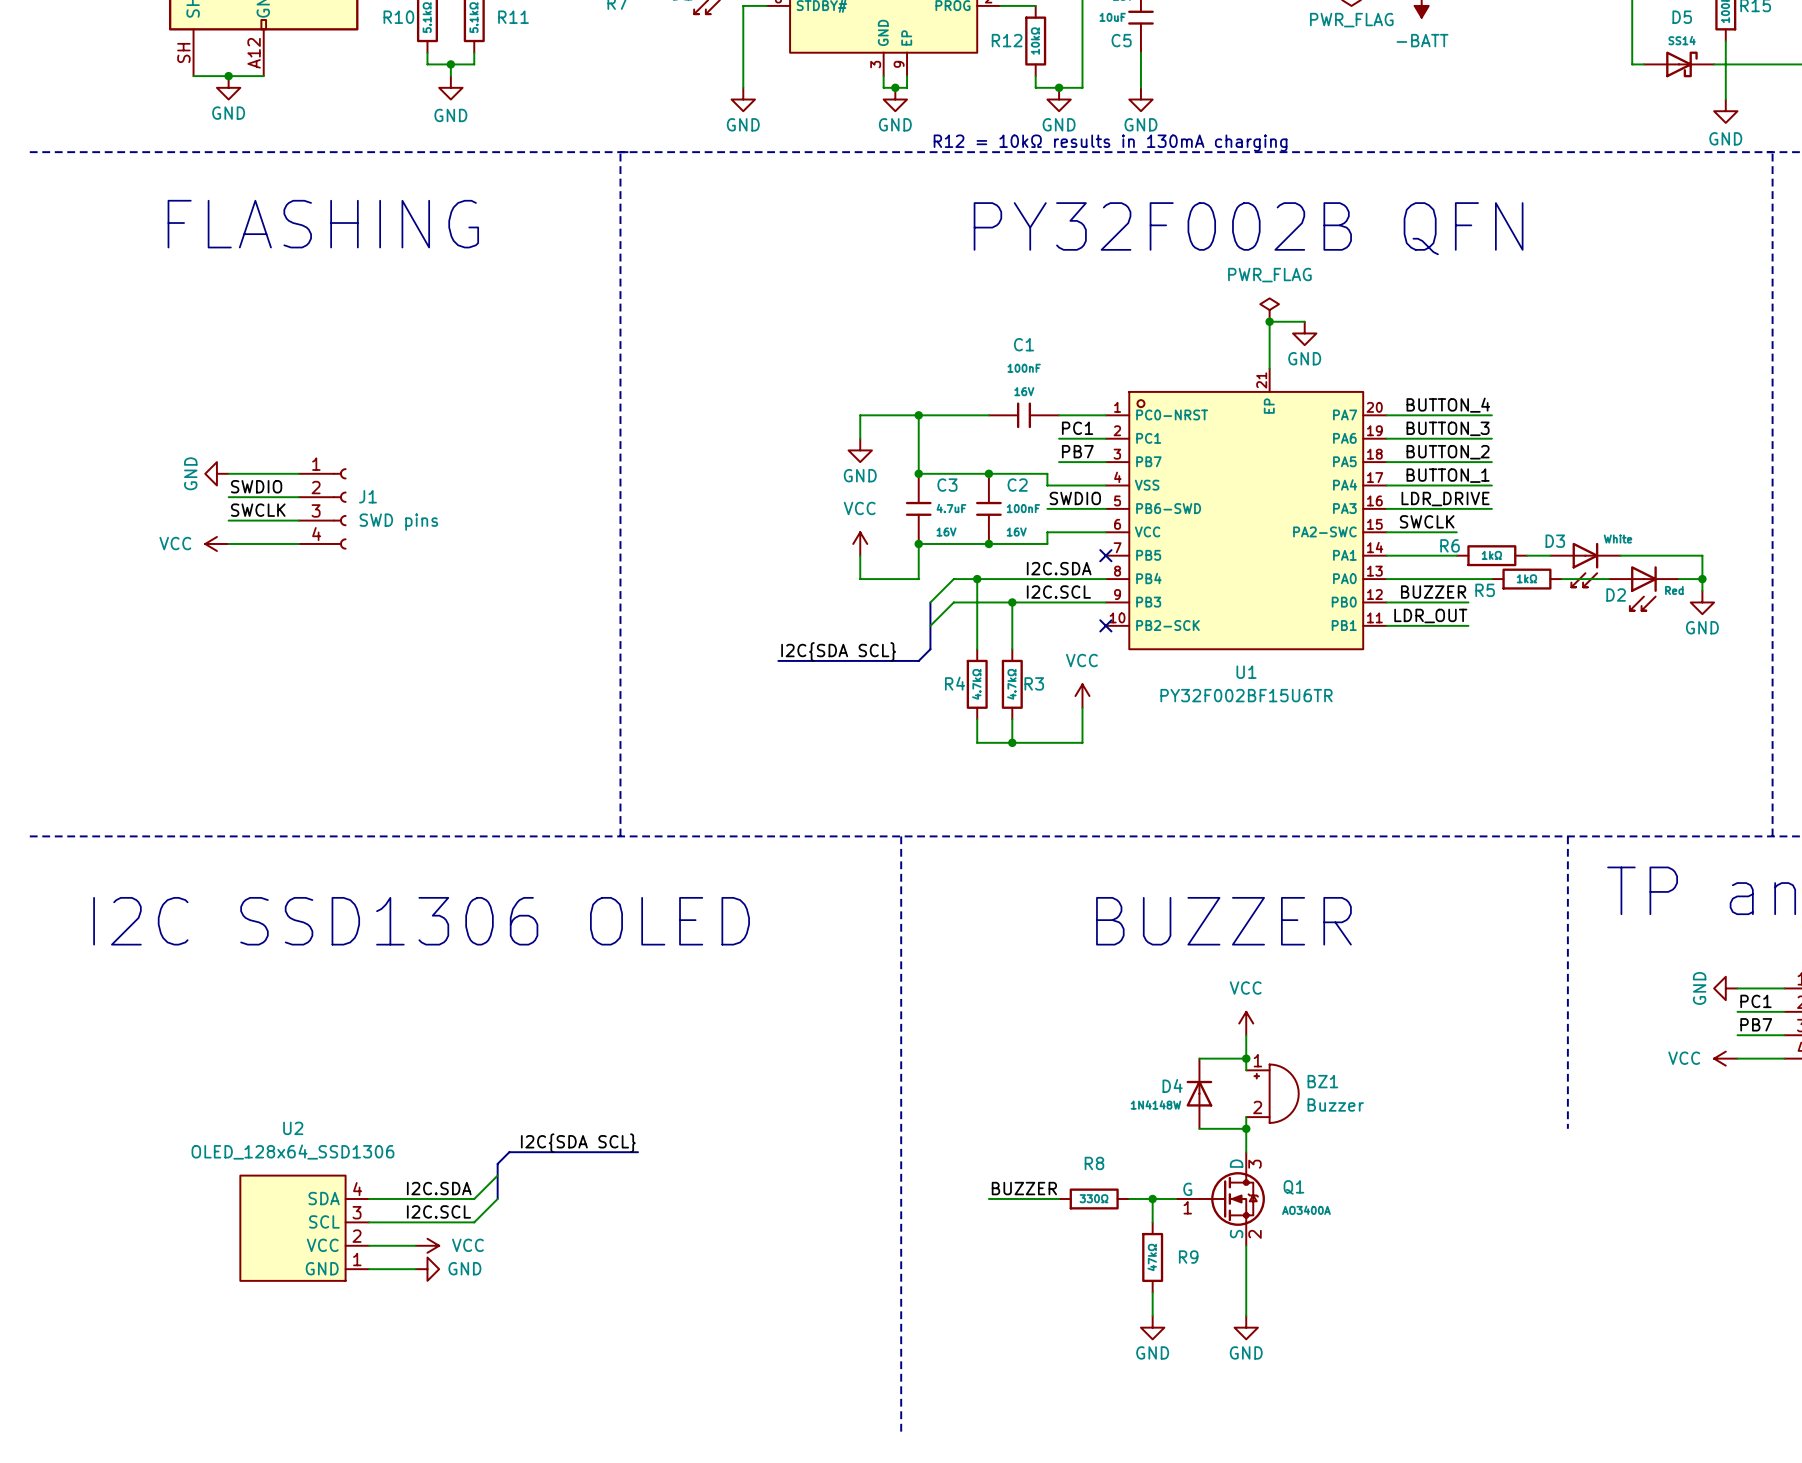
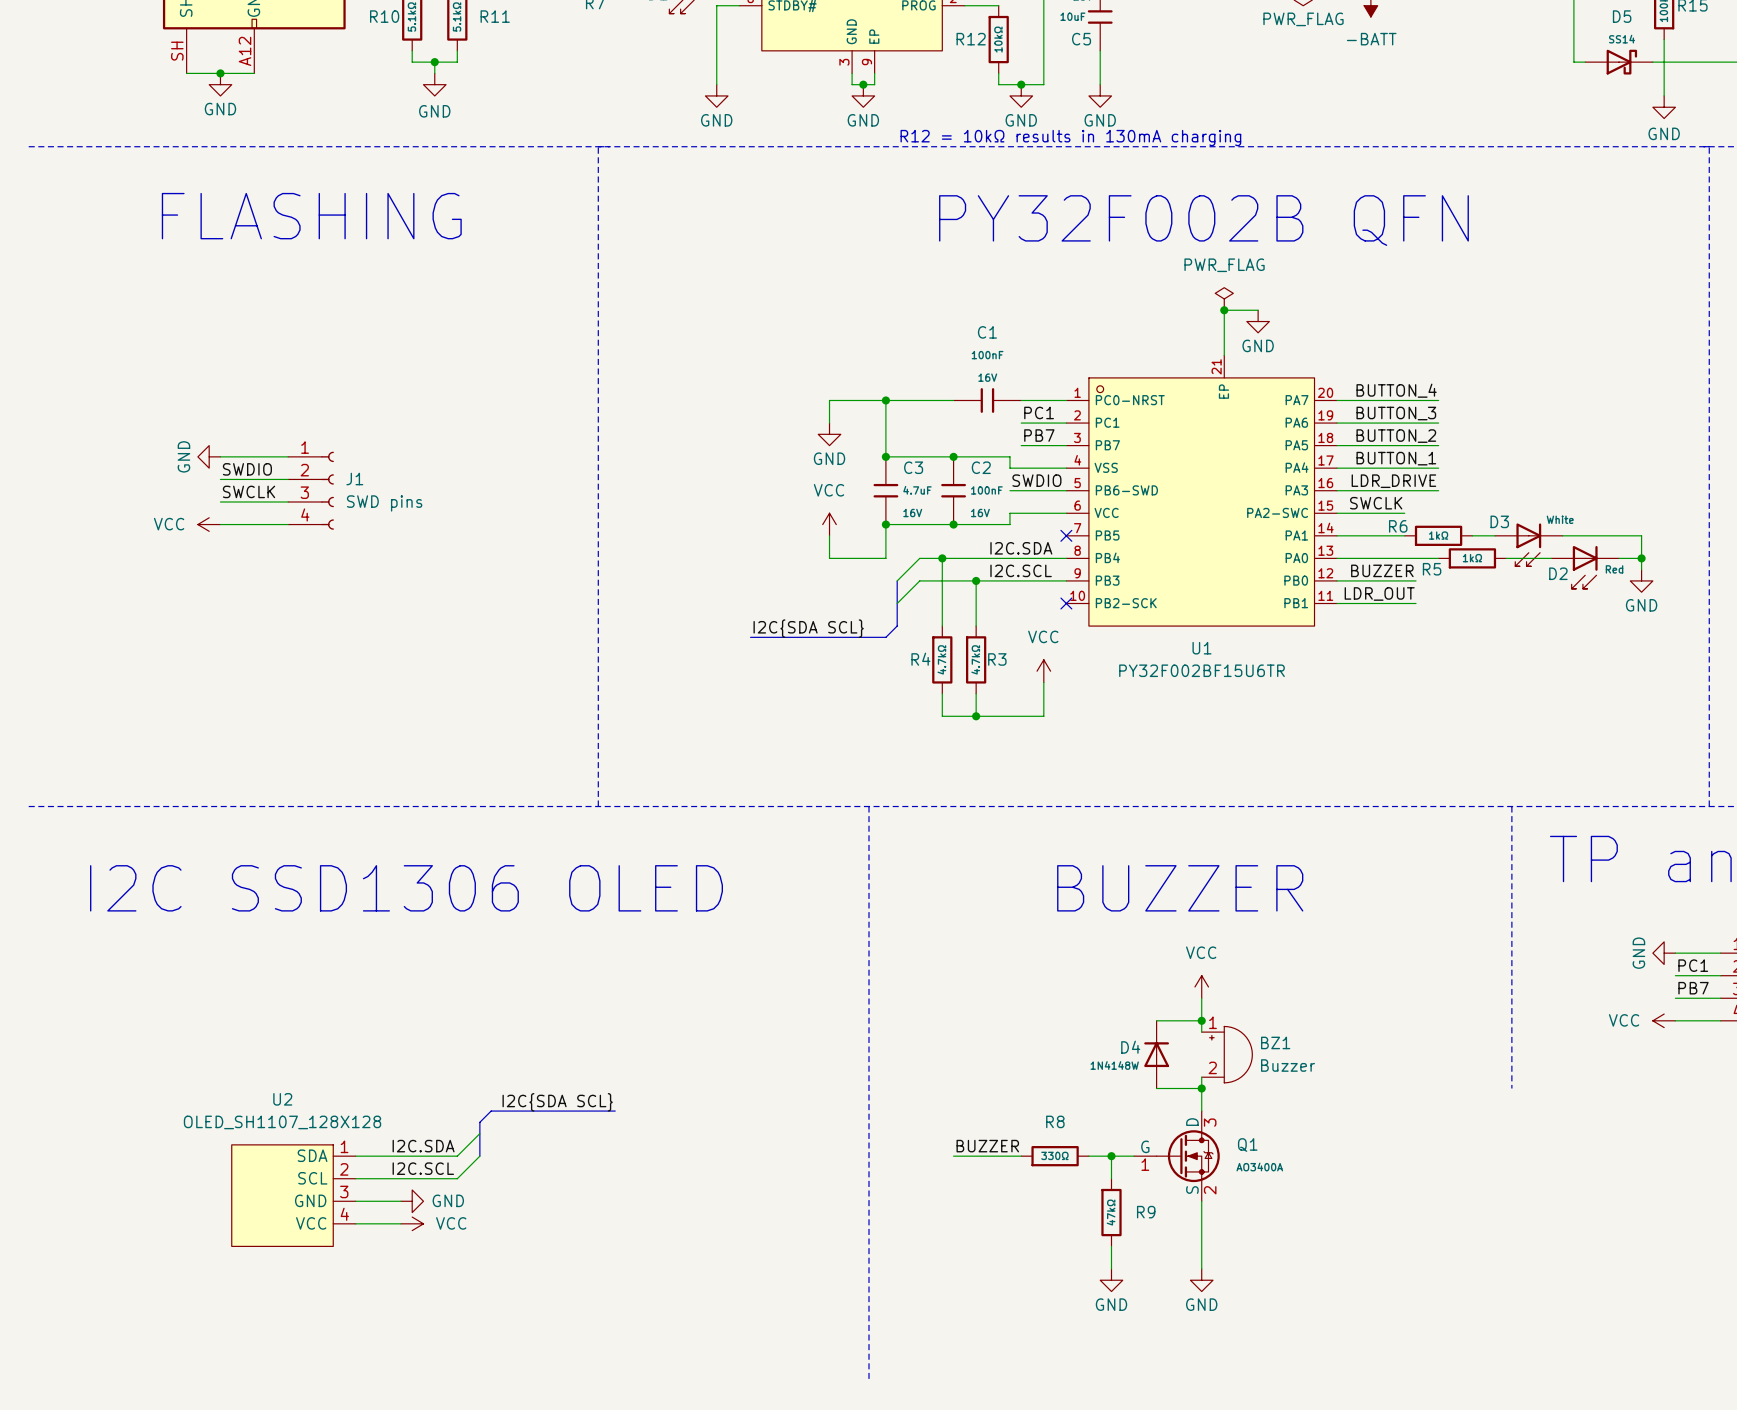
U2 value: OLED_128x64_SSD1306 (292, 1152) -> OLED_SH1107_128X128 (282, 1122)
U2 symbol: [240, 1175, 369, 1281] -> [231, 1144, 356, 1247]
power symbol: VCC (427, 1245) -> GND (412, 1201)
power symbol: GND (427, 1269) -> VCC (412, 1223)

